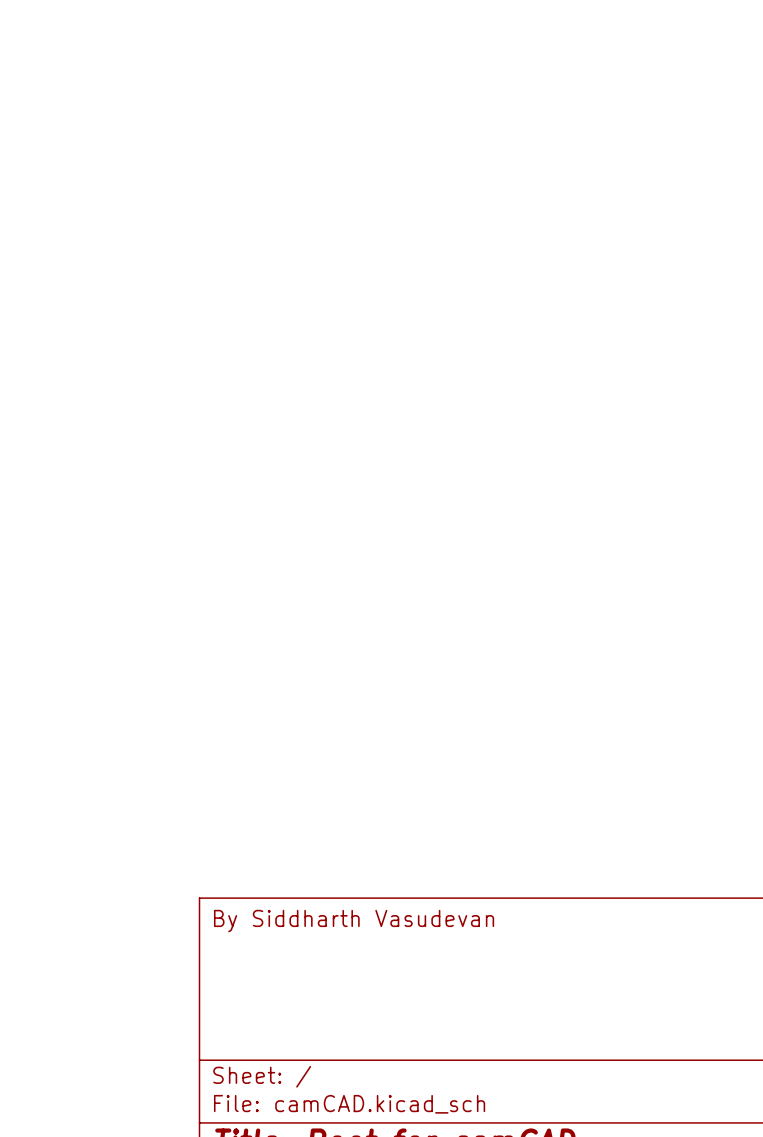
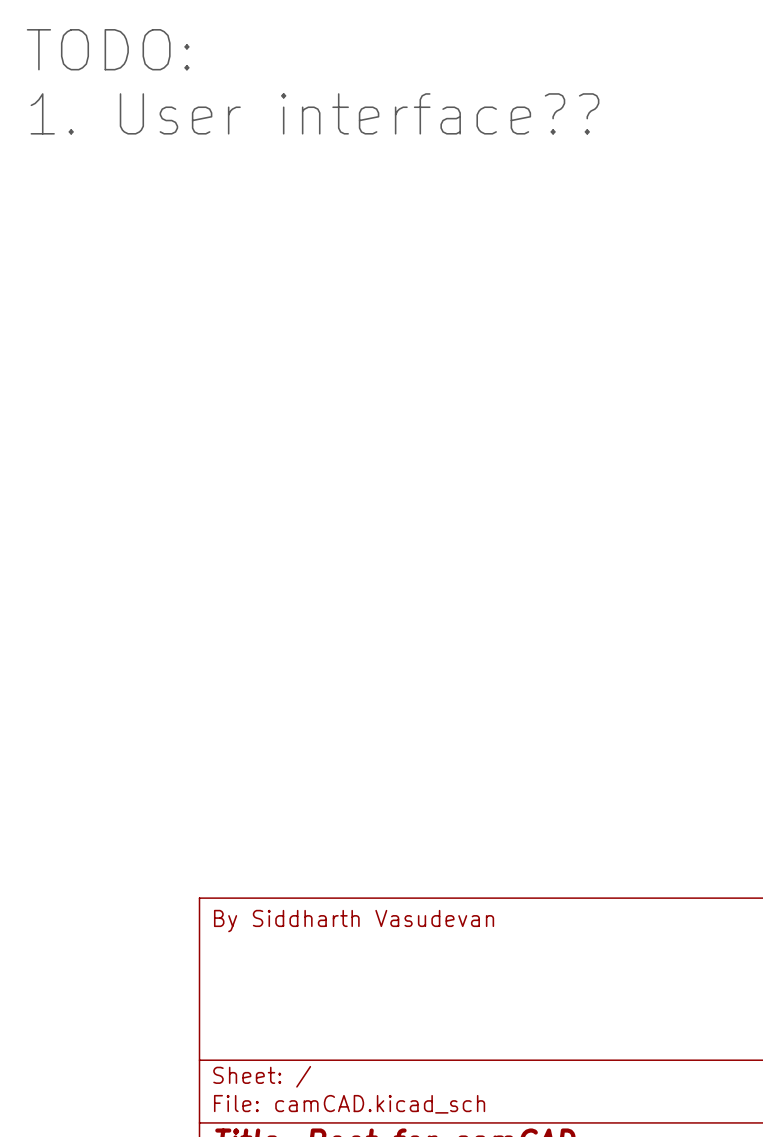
text: none -> TODO: (108, 49)
text: none -> 1. User interface?? (314, 113)

